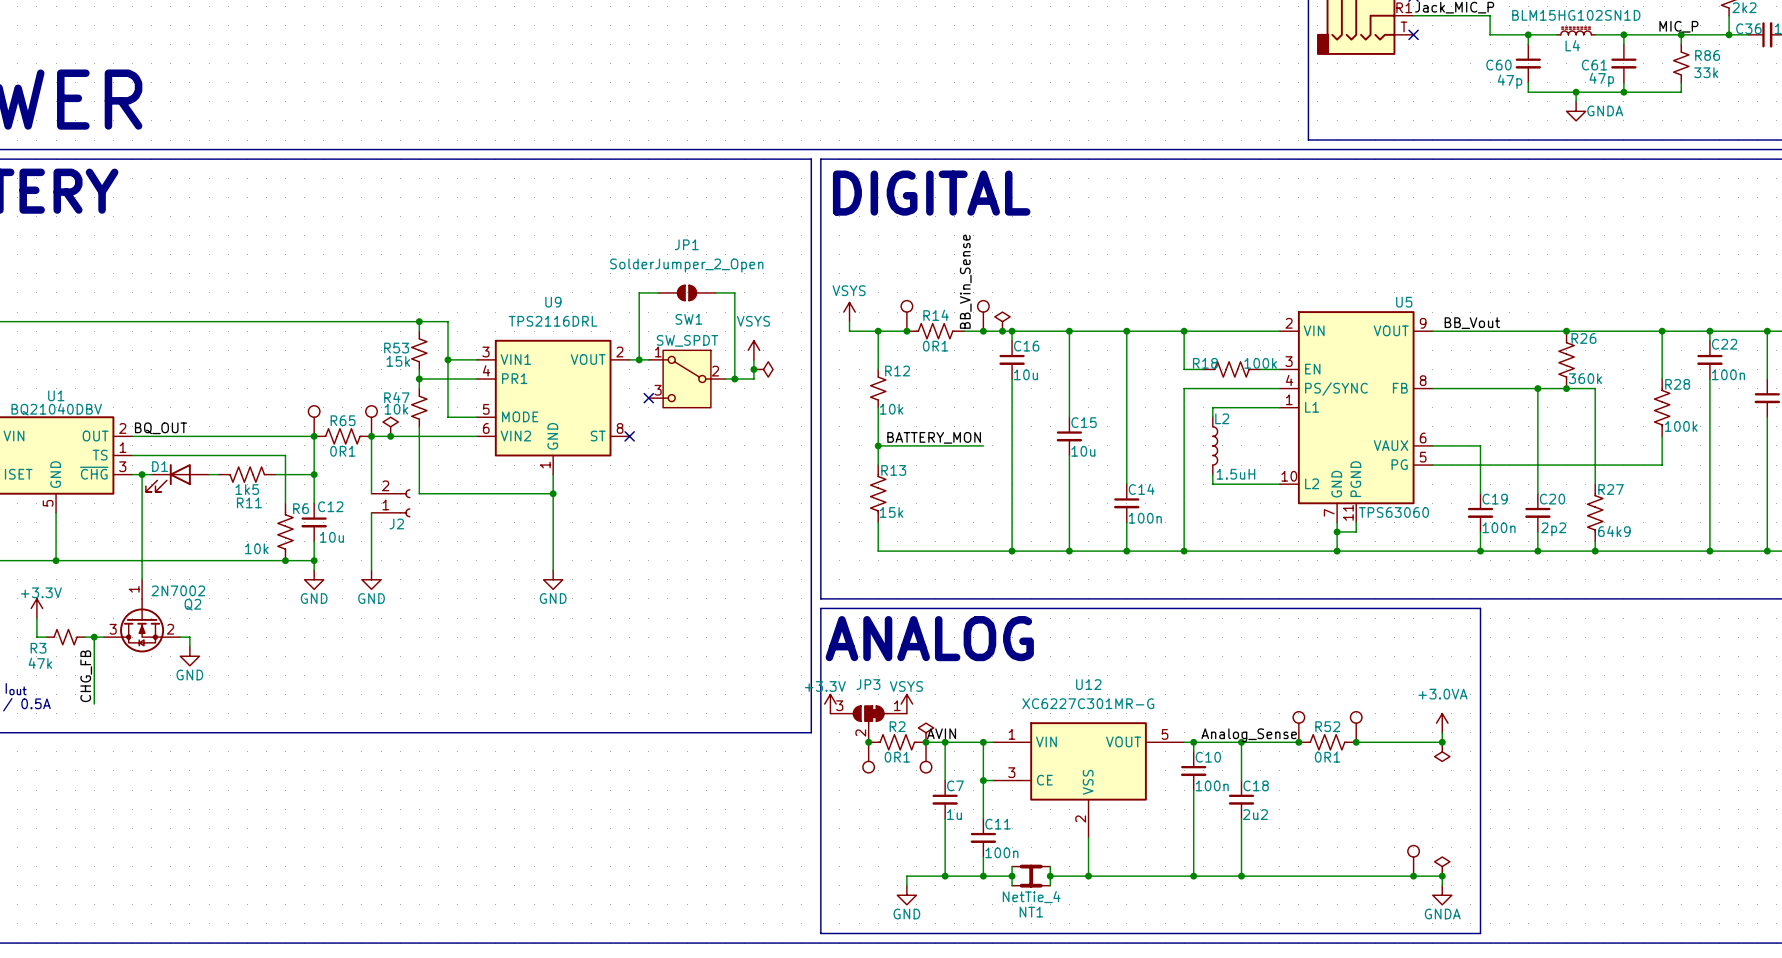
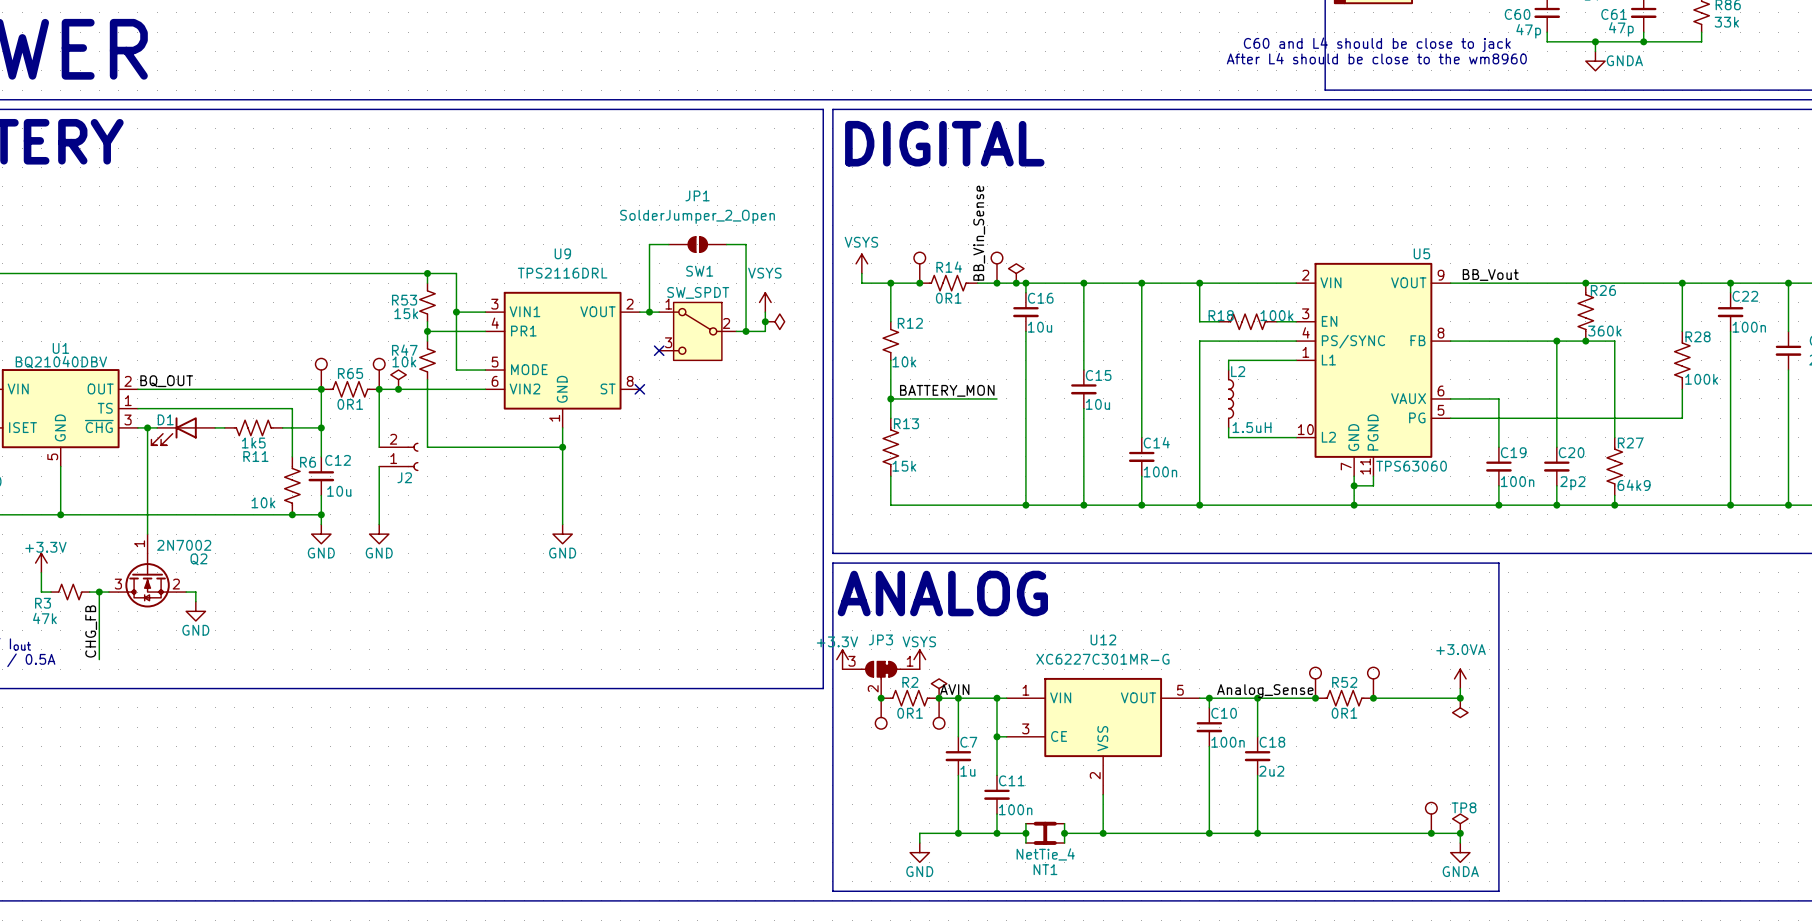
text: none -> C60 and L4 should be close to jack (1377, 44)
text: none -> After L4 should be close to the wm8960 (1376, 58)
TP8 name: none -> TP8 (1464, 807)

